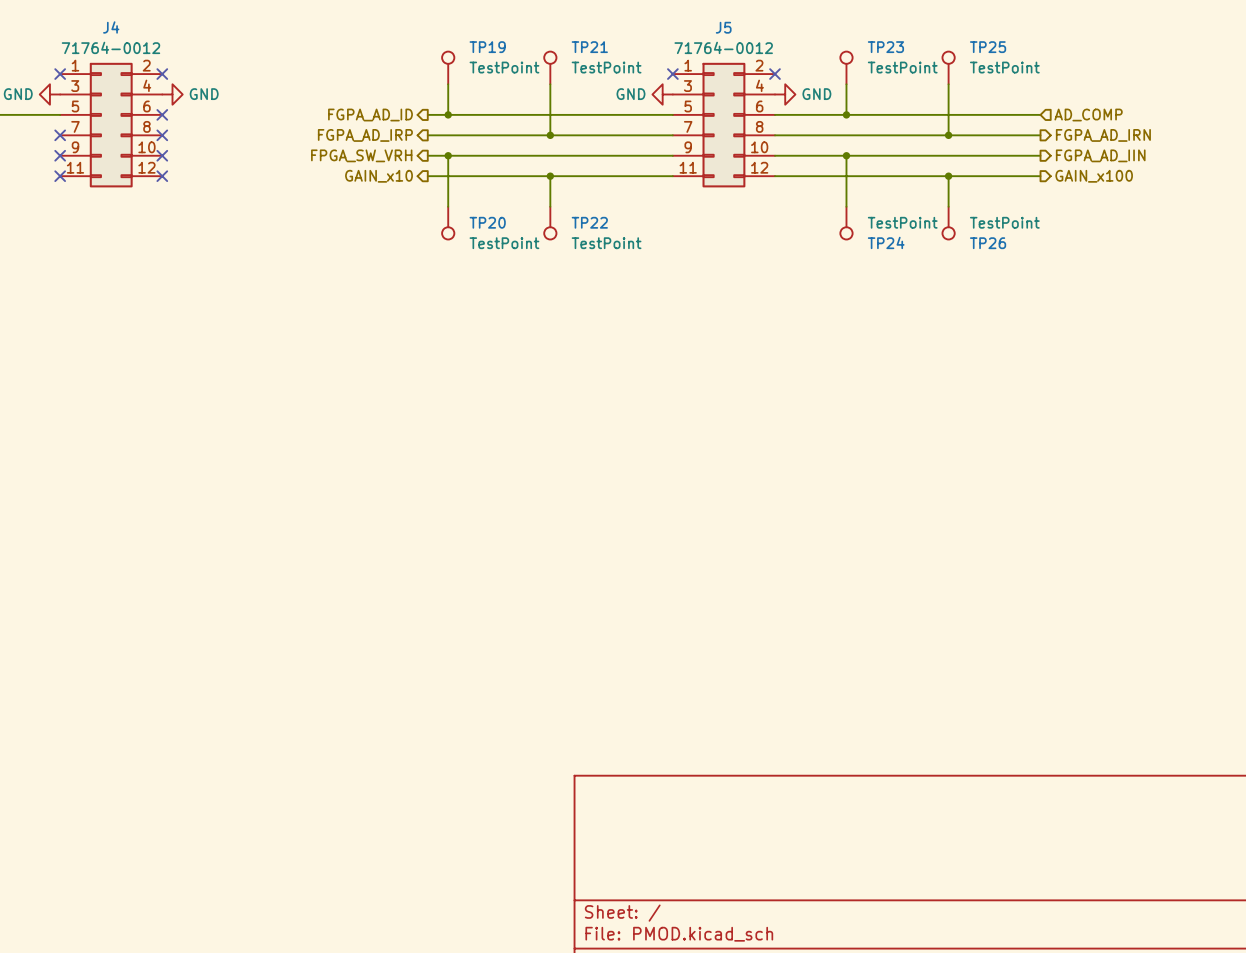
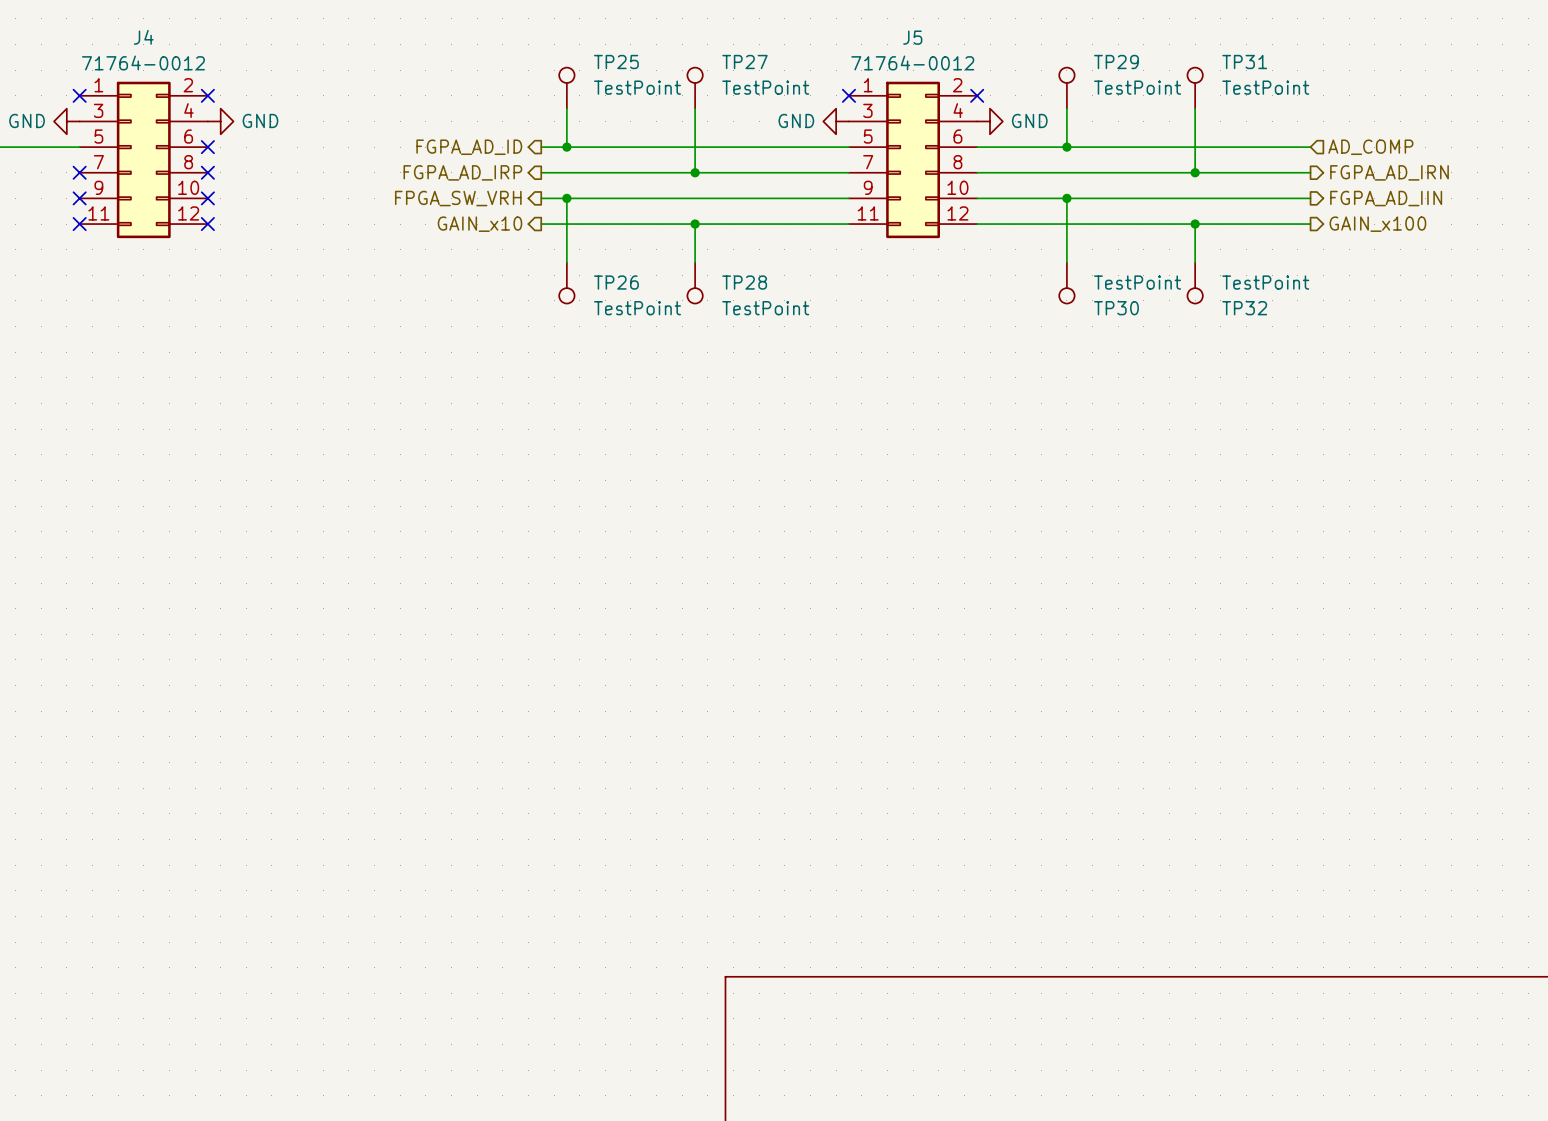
TP19 name: TP19 (487, 47) -> TP25 (616, 62)
TP21 name: TP21 (589, 47) -> TP27 (744, 62)
TP23 name: TP23 (885, 47) -> TP29 (1116, 62)
TP25 name: TP25 (988, 47) -> TP31 (1244, 62)
TP20 name: TP20 (487, 222) -> TP26 (616, 282)
TP22 name: TP22 (589, 222) -> TP28 (744, 282)
TP24 name: TP24 (886, 242) -> TP30 (1116, 308)
TP26 name: TP26 (988, 243) -> TP32 (1244, 308)

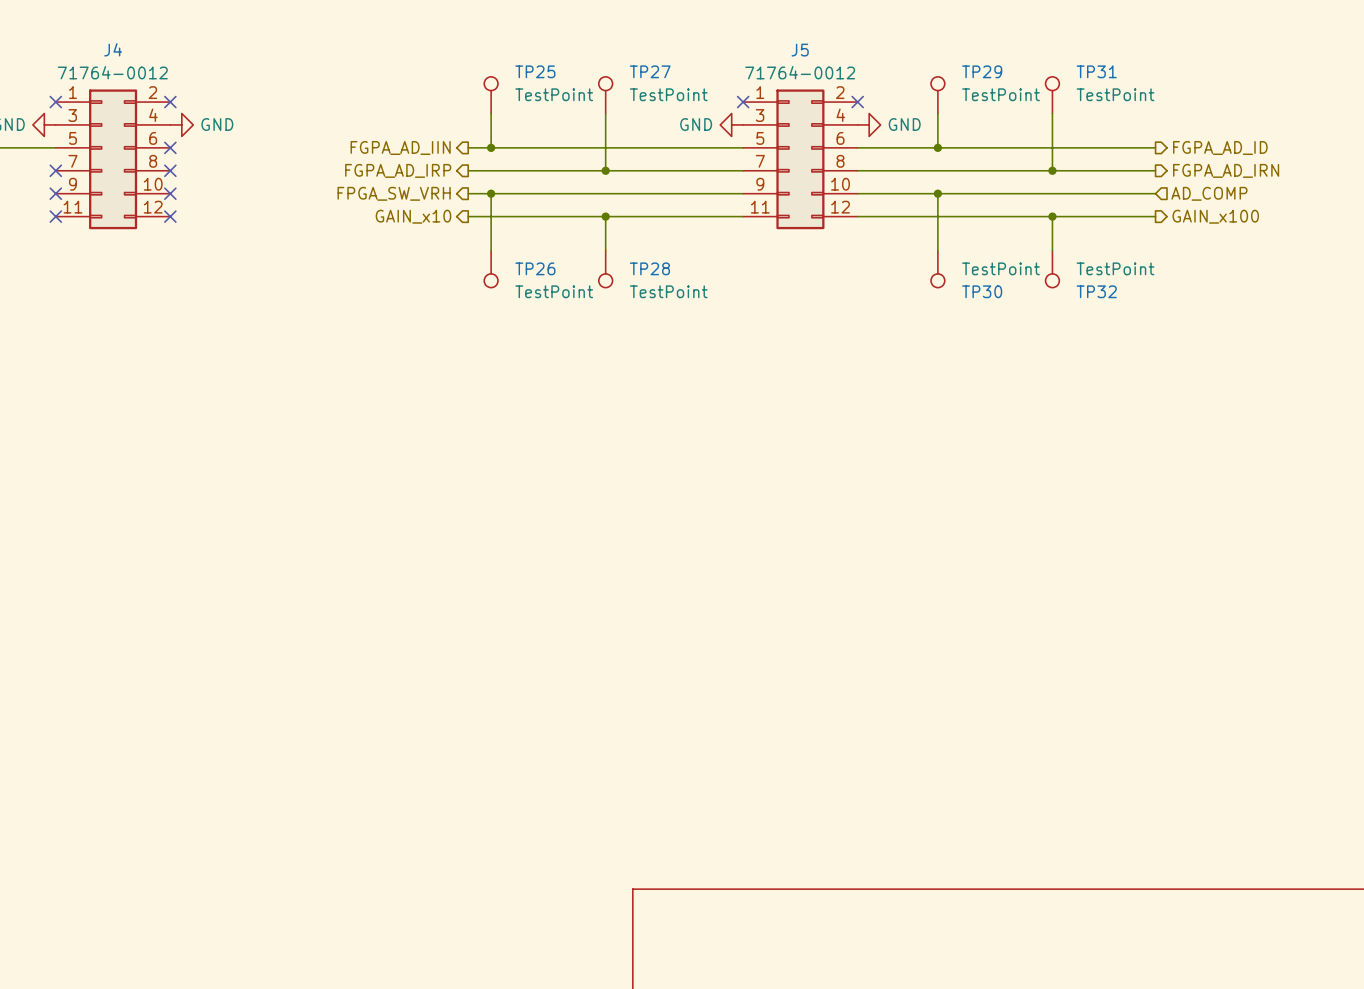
hierarchical label: FGPA_AD_ID (469, 147) -> FGPA_AD_IIN (400, 147)
hierarchical label shape: input (1370, 147) -> output (1220, 147)
hierarchical label: AD_COMP (1370, 147) -> FGPA_AD_ID (1220, 147)
hierarchical label shape: output (1386, 198) -> input (1209, 193)
hierarchical label: FGPA_AD_IIN (1386, 198) -> AD_COMP (1209, 193)

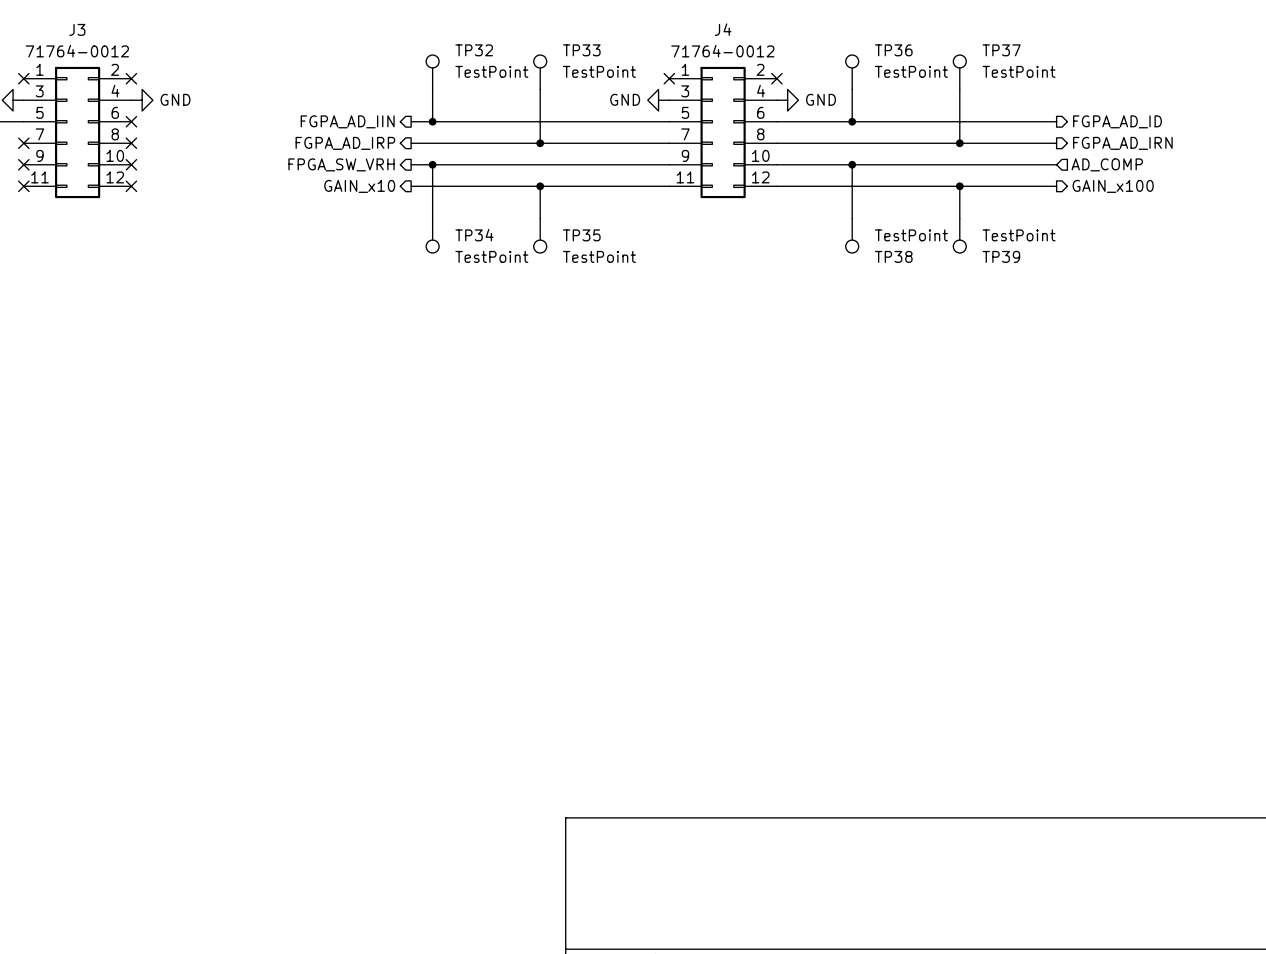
J4 name: J4 (113, 49) -> J3 (77, 29)
J5 name: J5 (800, 50) -> J4 (723, 29)
TP25 name: TP25 (535, 71) -> TP32 (474, 50)
TP27 name: TP27 (650, 71) -> TP33 (581, 50)
TP29 name: TP29 (982, 71) -> TP36 (893, 50)
TP31 name: TP31 (1096, 71) -> TP37 (1001, 50)
TP26 name: TP26 (535, 268) -> TP34 (474, 235)
TP28 name: TP28 (649, 268) -> TP35 (581, 235)
TP30 name: TP30 (982, 291) -> TP38 (893, 256)
TP32 name: TP32 (1096, 291) -> TP39 (1001, 256)

